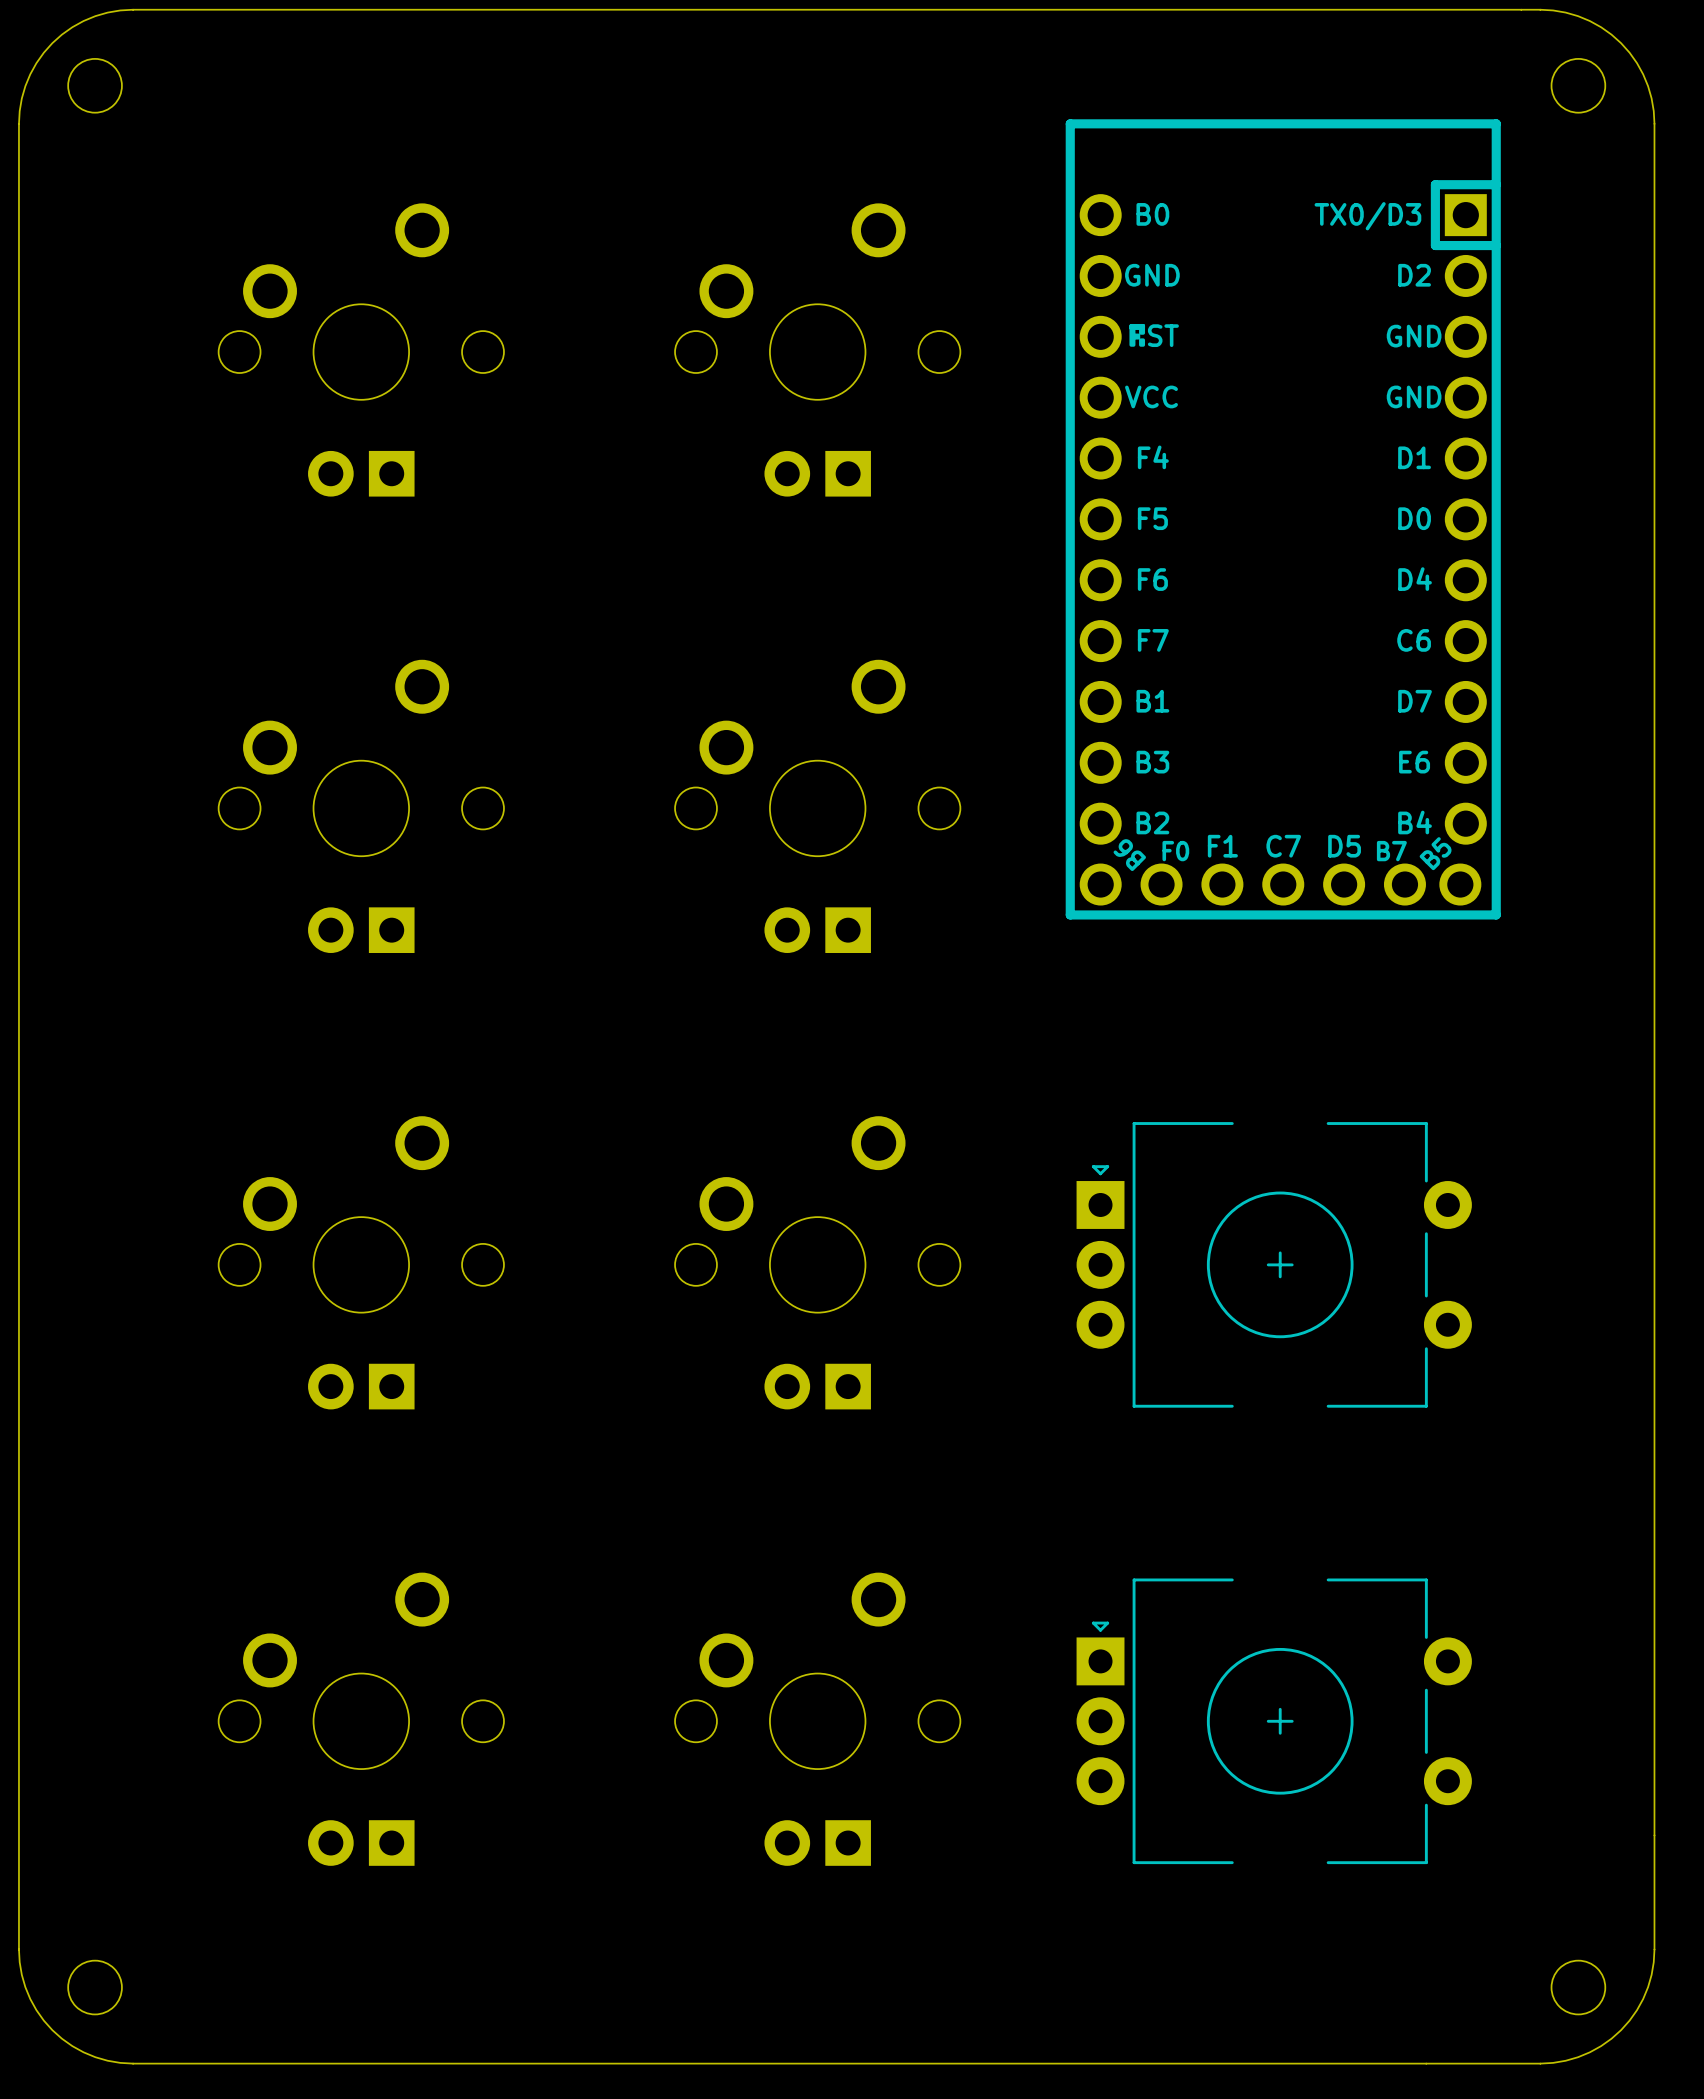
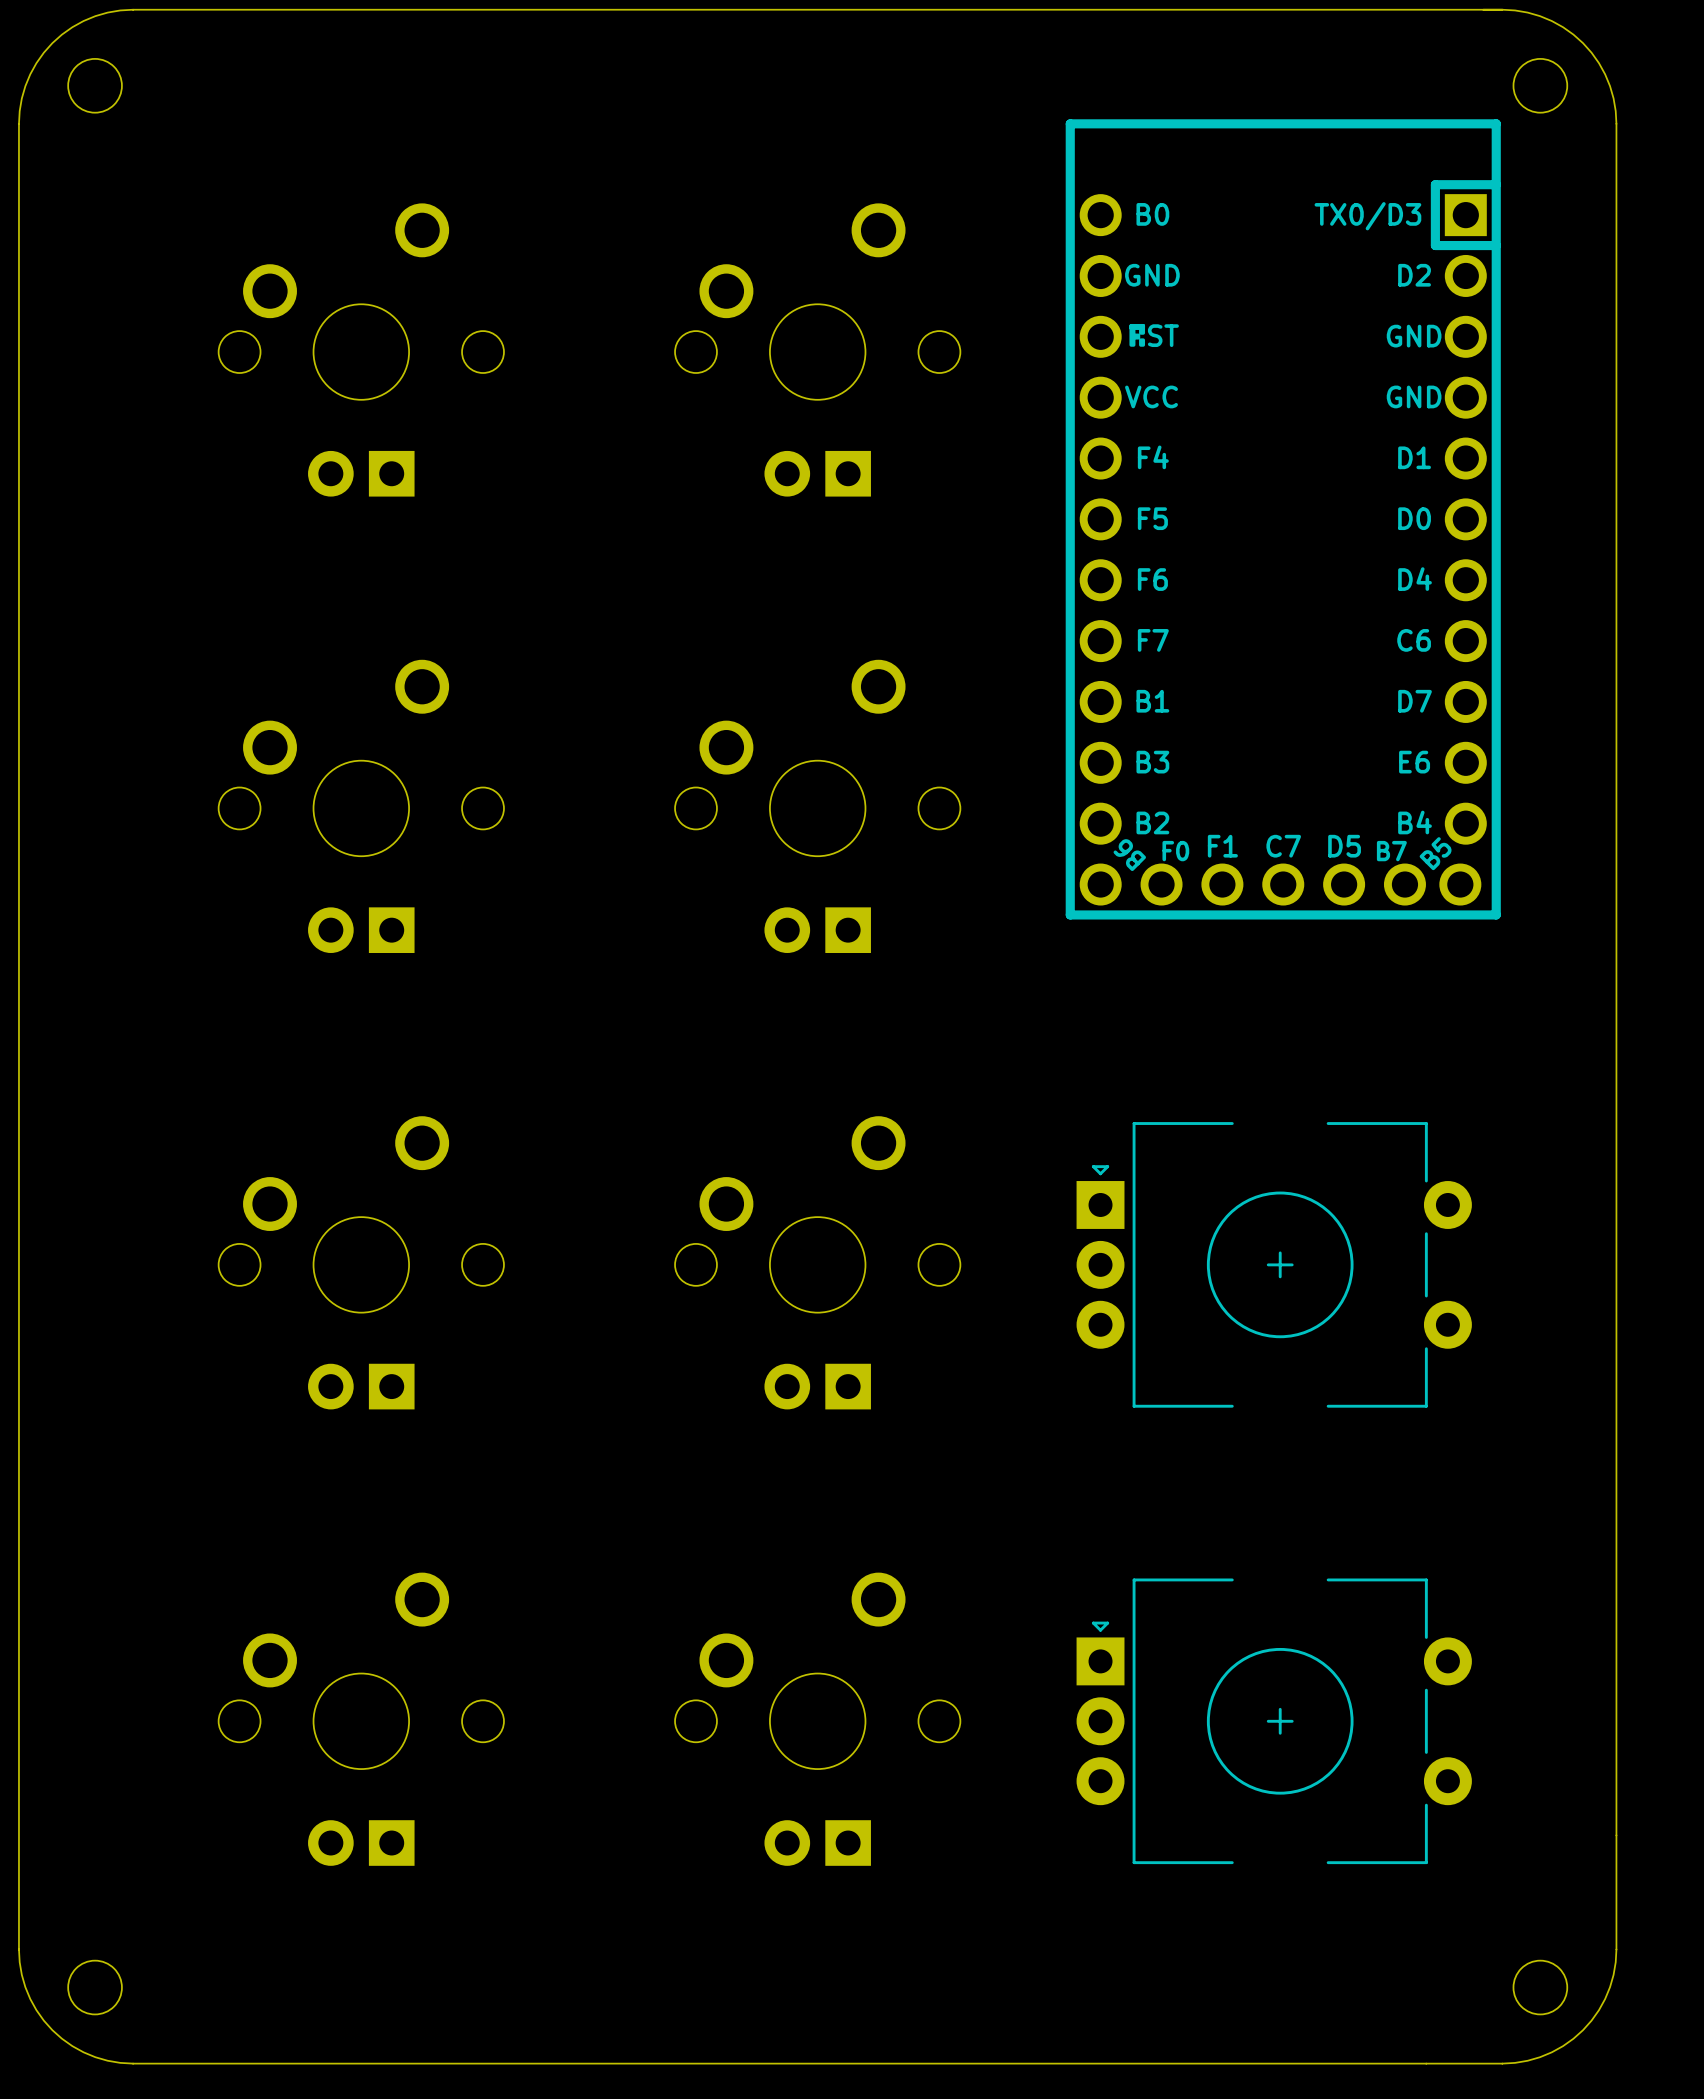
board edge: (1502, 9) (1540, 9) (1565, 12) (1601, 27) (1621, 43) (1636, 63) (1648, 86) (1653, 111) (1654, 1949) -> (1502, 9) (1527, 12) (1551, 21) (1583, 43) (1598, 63) (1610, 86) (1616, 123) (1615, 1962) (1605, 1999) (1583, 2030) (1551, 2052) (1527, 2060) (1502, 2063)
round board edge position: (1578, 85) -> (1540, 85)
board edge: (1654, 1949) (1651, 1974) (1643, 1999) (1629, 2020) (1611, 2038) (1589, 2052) (1565, 2060) (1540, 2063) (1502, 2063) -> none
round board edge position: (1578, 1987) -> (1540, 1987)

